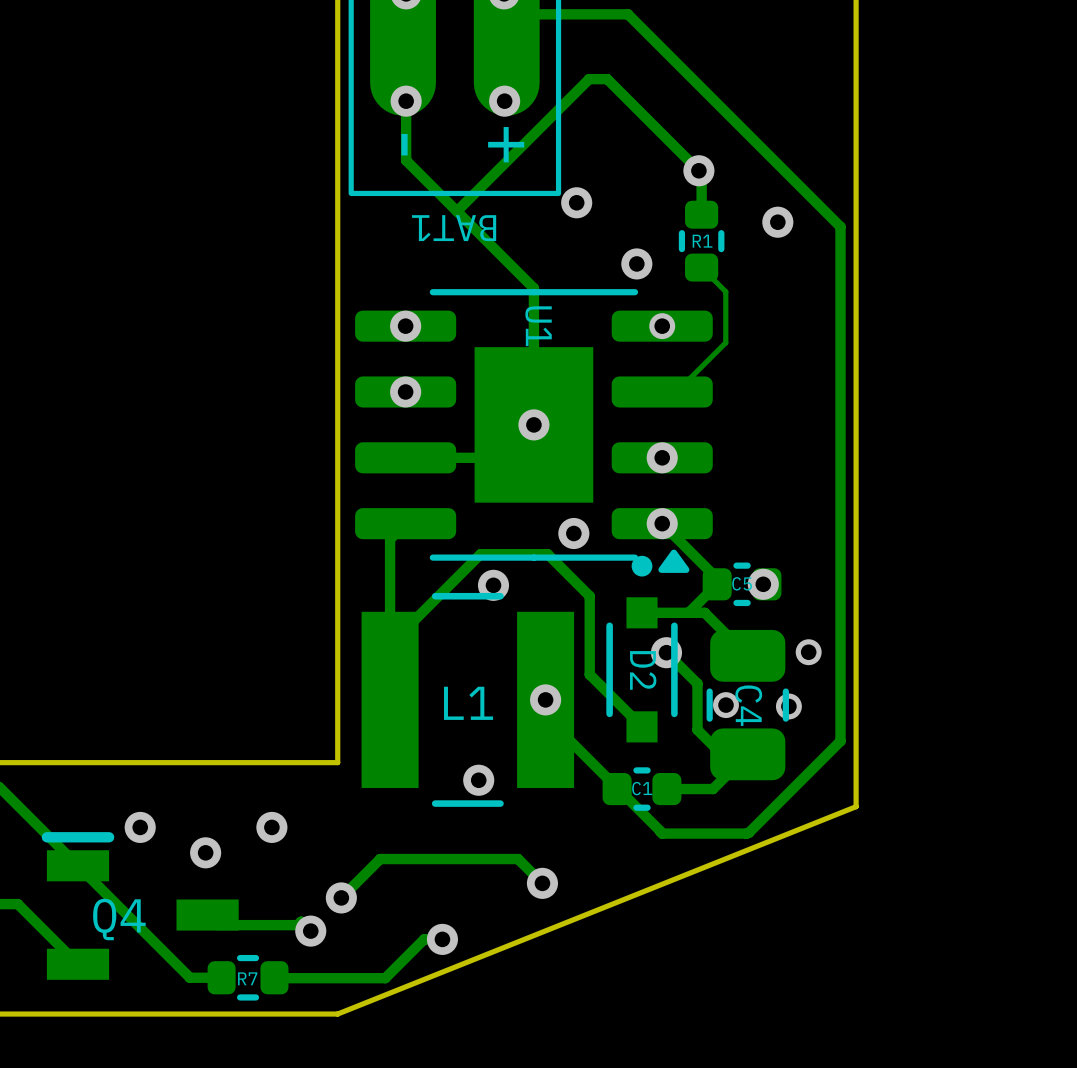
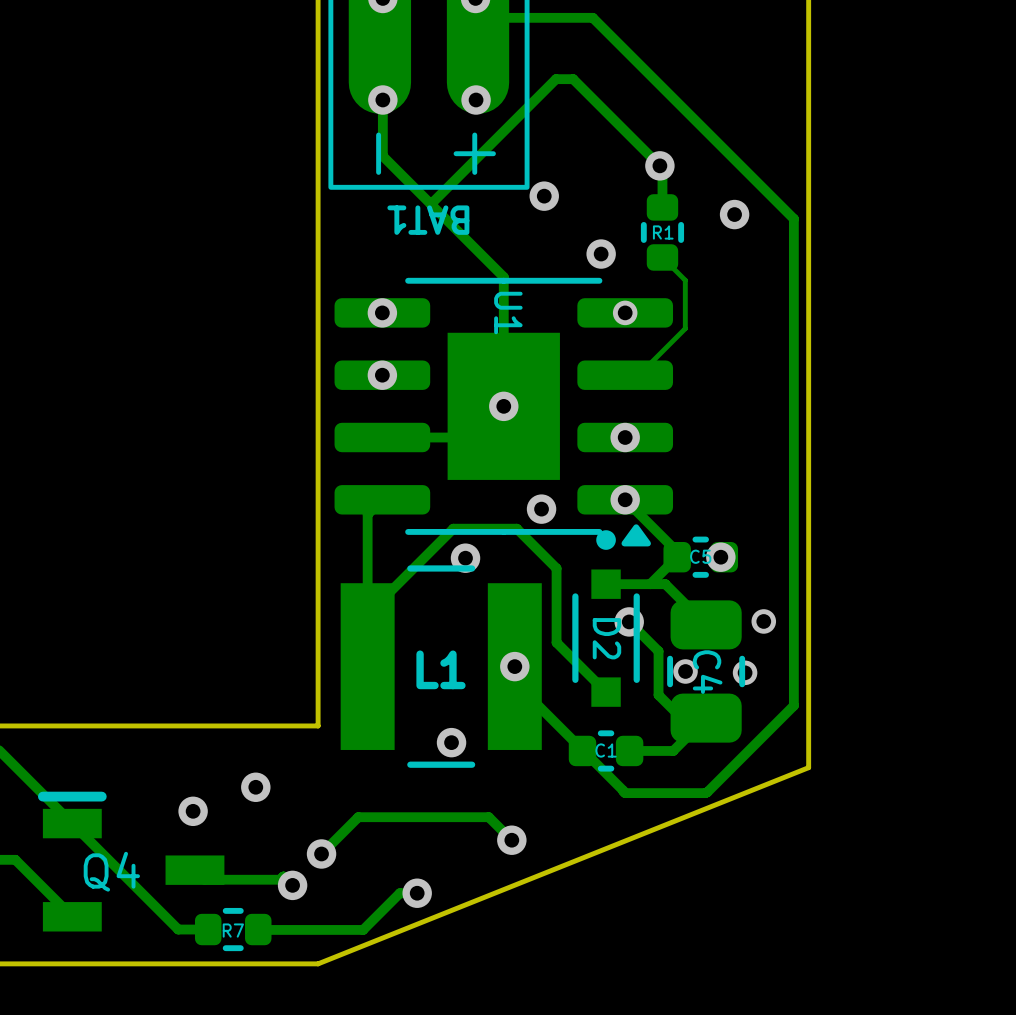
via: (140, 827) -> none

